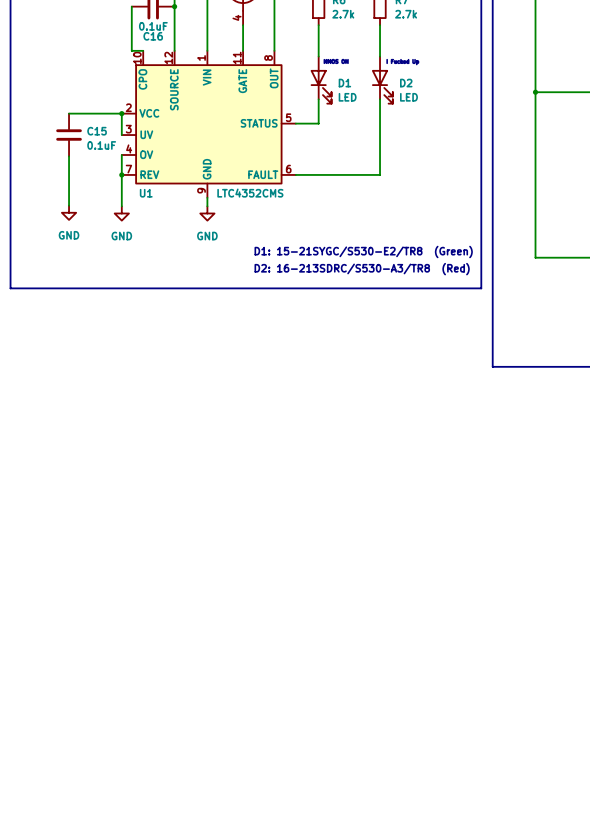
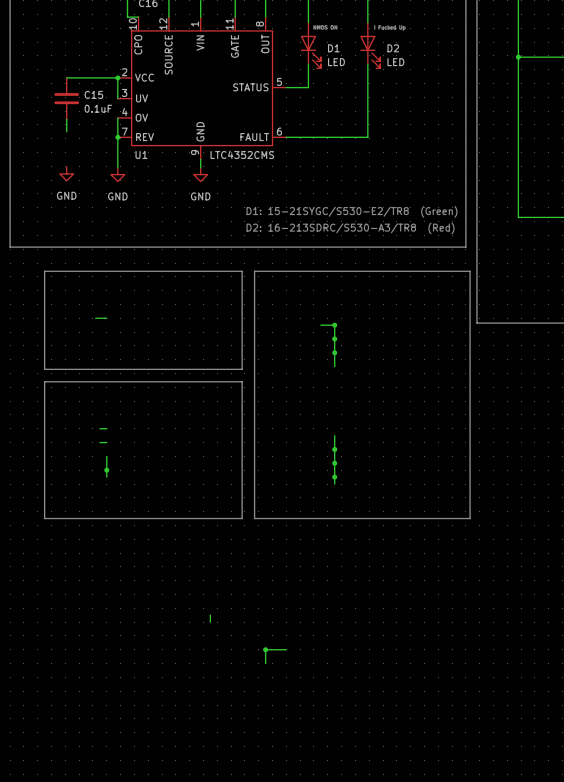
wire: (69, 169) (69, 205) -> none
line: none -> (44, 271) (44, 369) (242, 369) (242, 271) (44, 271)
line: none -> (254, 271) (470, 271) (470, 518) (254, 518) (254, 271)
wire: none -> (95, 318) (106, 318)
wire: none -> (320, 325) (334, 325) (334, 366)
junction: none -> (334, 325)
junction: none -> (334, 338)
junction: none -> (334, 352)
line: none -> (44, 381) (242, 381) (242, 518) (44, 518) (44, 381)
wire: none -> (99, 428) (106, 428)
wire: none -> (334, 435) (334, 484)
wire: none -> (99, 442) (106, 442)
junction: none -> (334, 449)
wire: none -> (106, 456) (106, 477)
junction: none -> (334, 463)
junction: none -> (106, 470)
junction: none -> (334, 477)
wire: none -> (210, 615) (210, 622)
junction: none -> (265, 649)
wire: none -> (286, 649) (265, 649) (265, 663)

